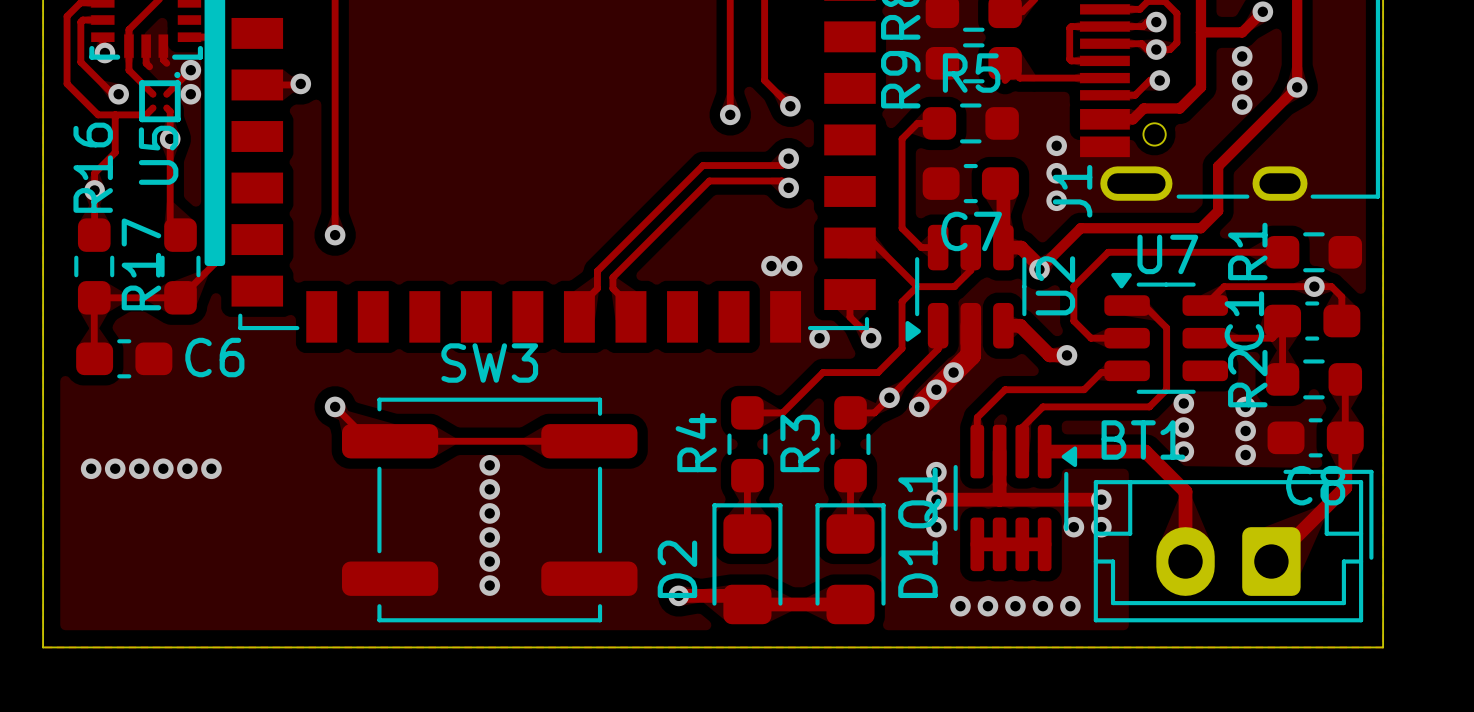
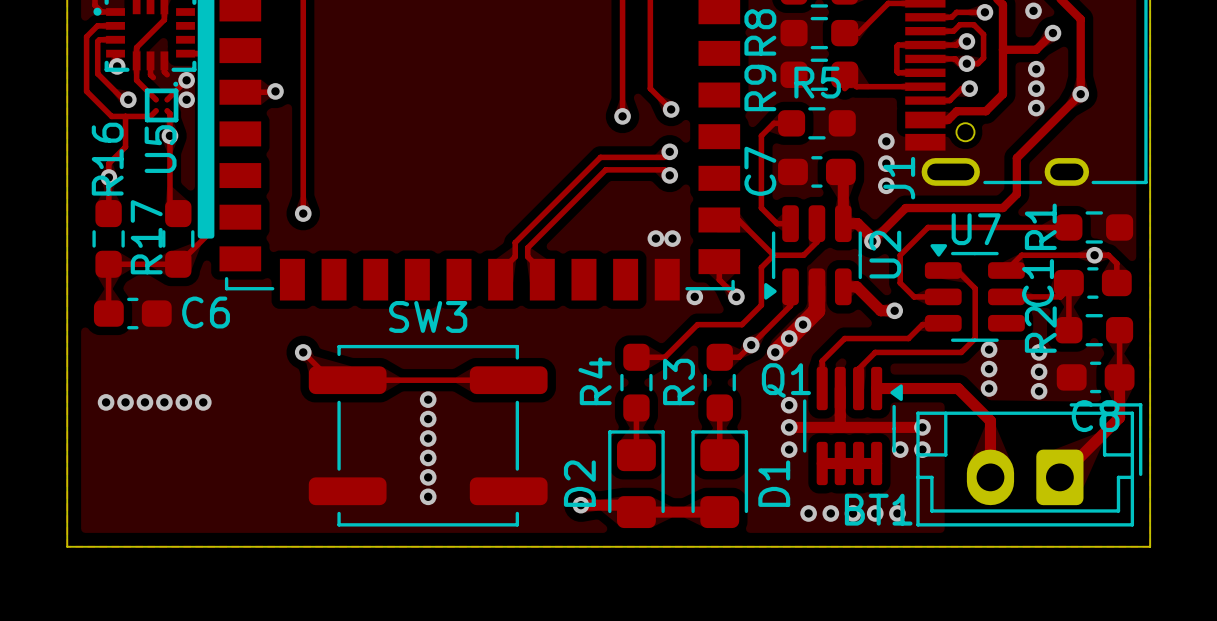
C7 name rotation: 0° (971, 231) -> 90° counterclockwise (760, 171)
BT1 name position: BT1 (1143, 439) -> BT1 (878, 509)
Q1 name rotation: 0° (919, 497) -> 90° clockwise (786, 380)

